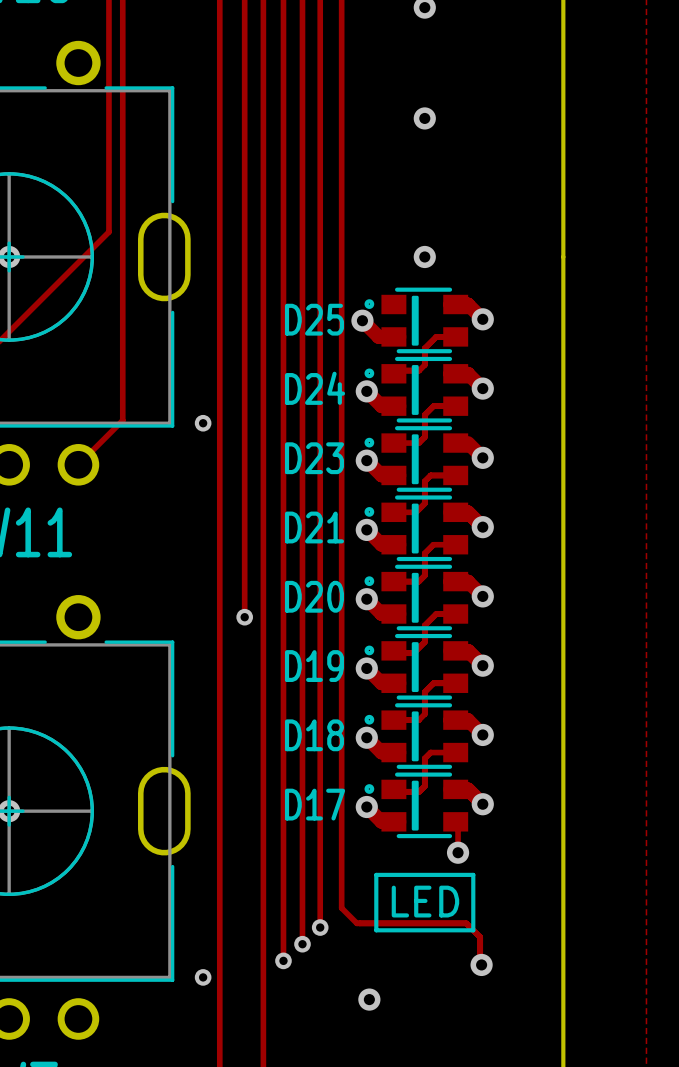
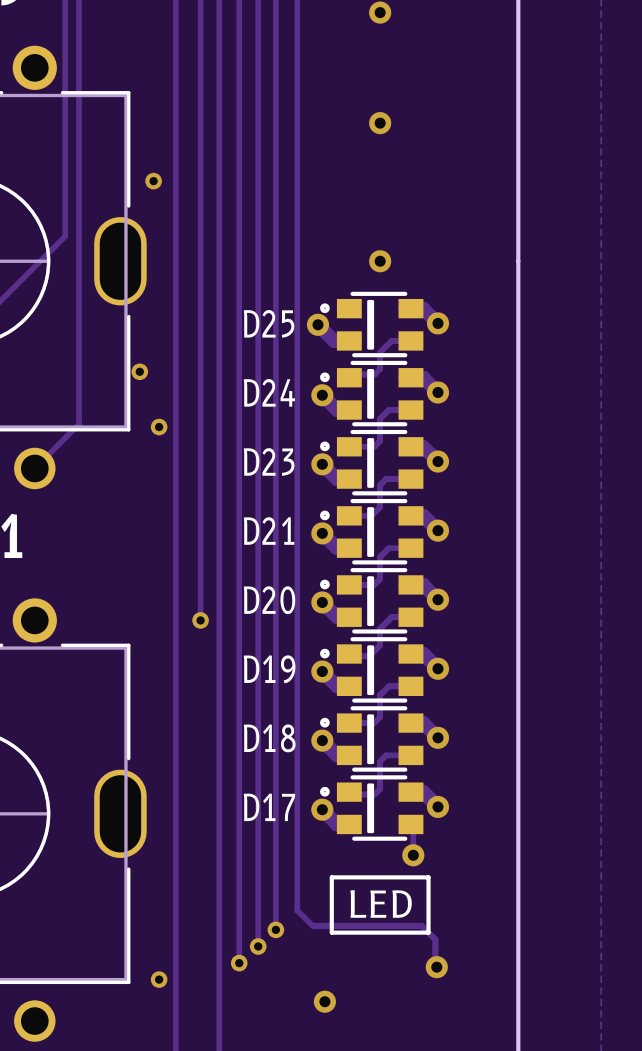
via: none -> (153, 181)
via: none -> (139, 371)

